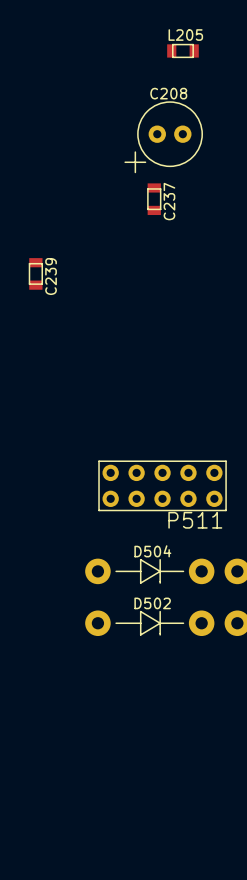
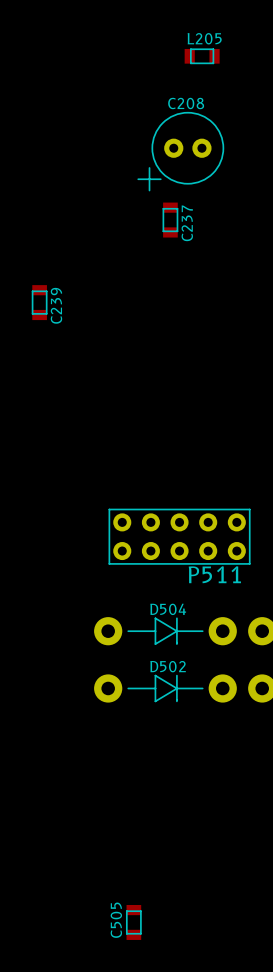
C505: none -> (133, 922)

